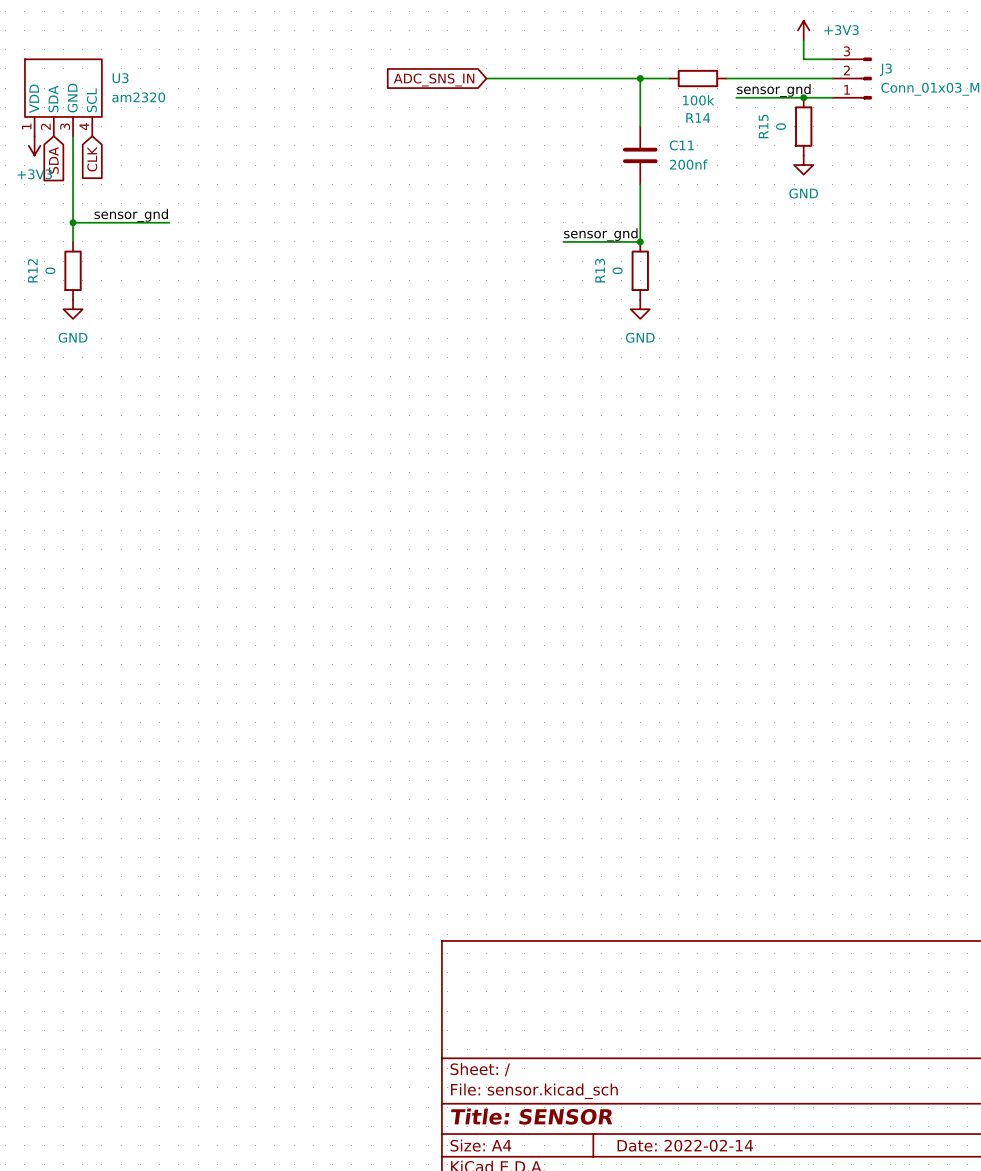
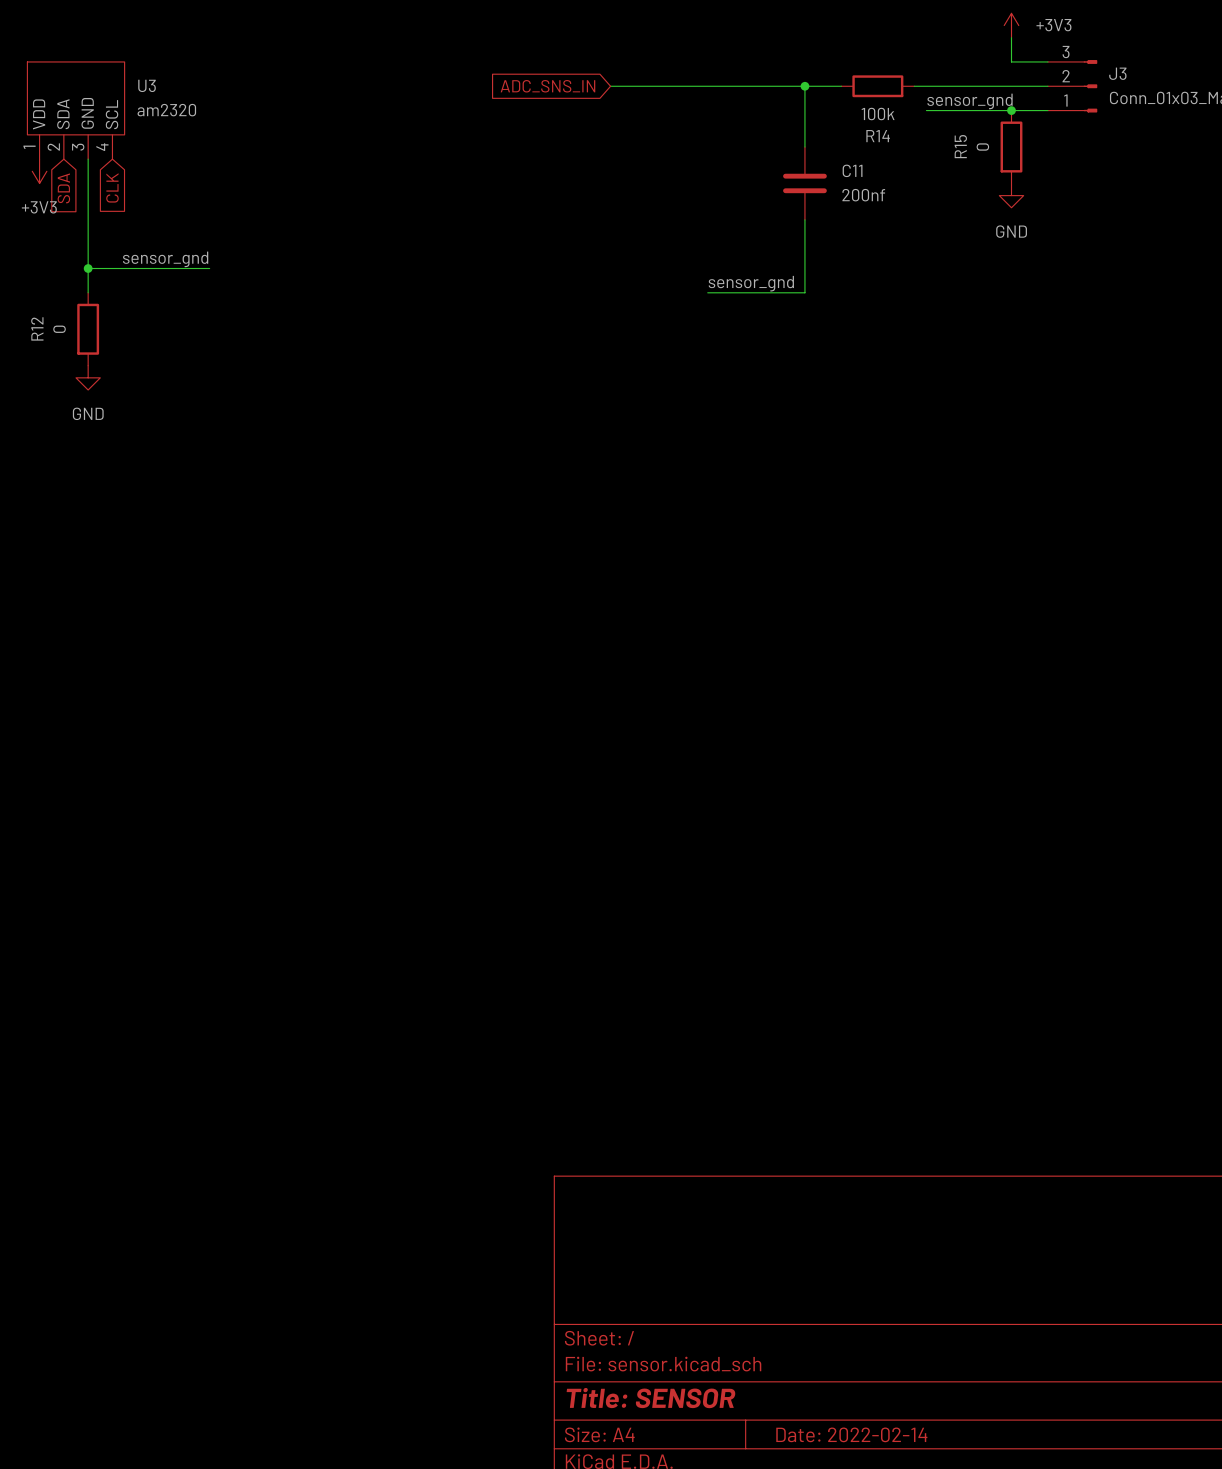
junction: (640, 241) -> none
R13: 0 (640, 270) -> none
power symbol: GND (640, 309) -> none

